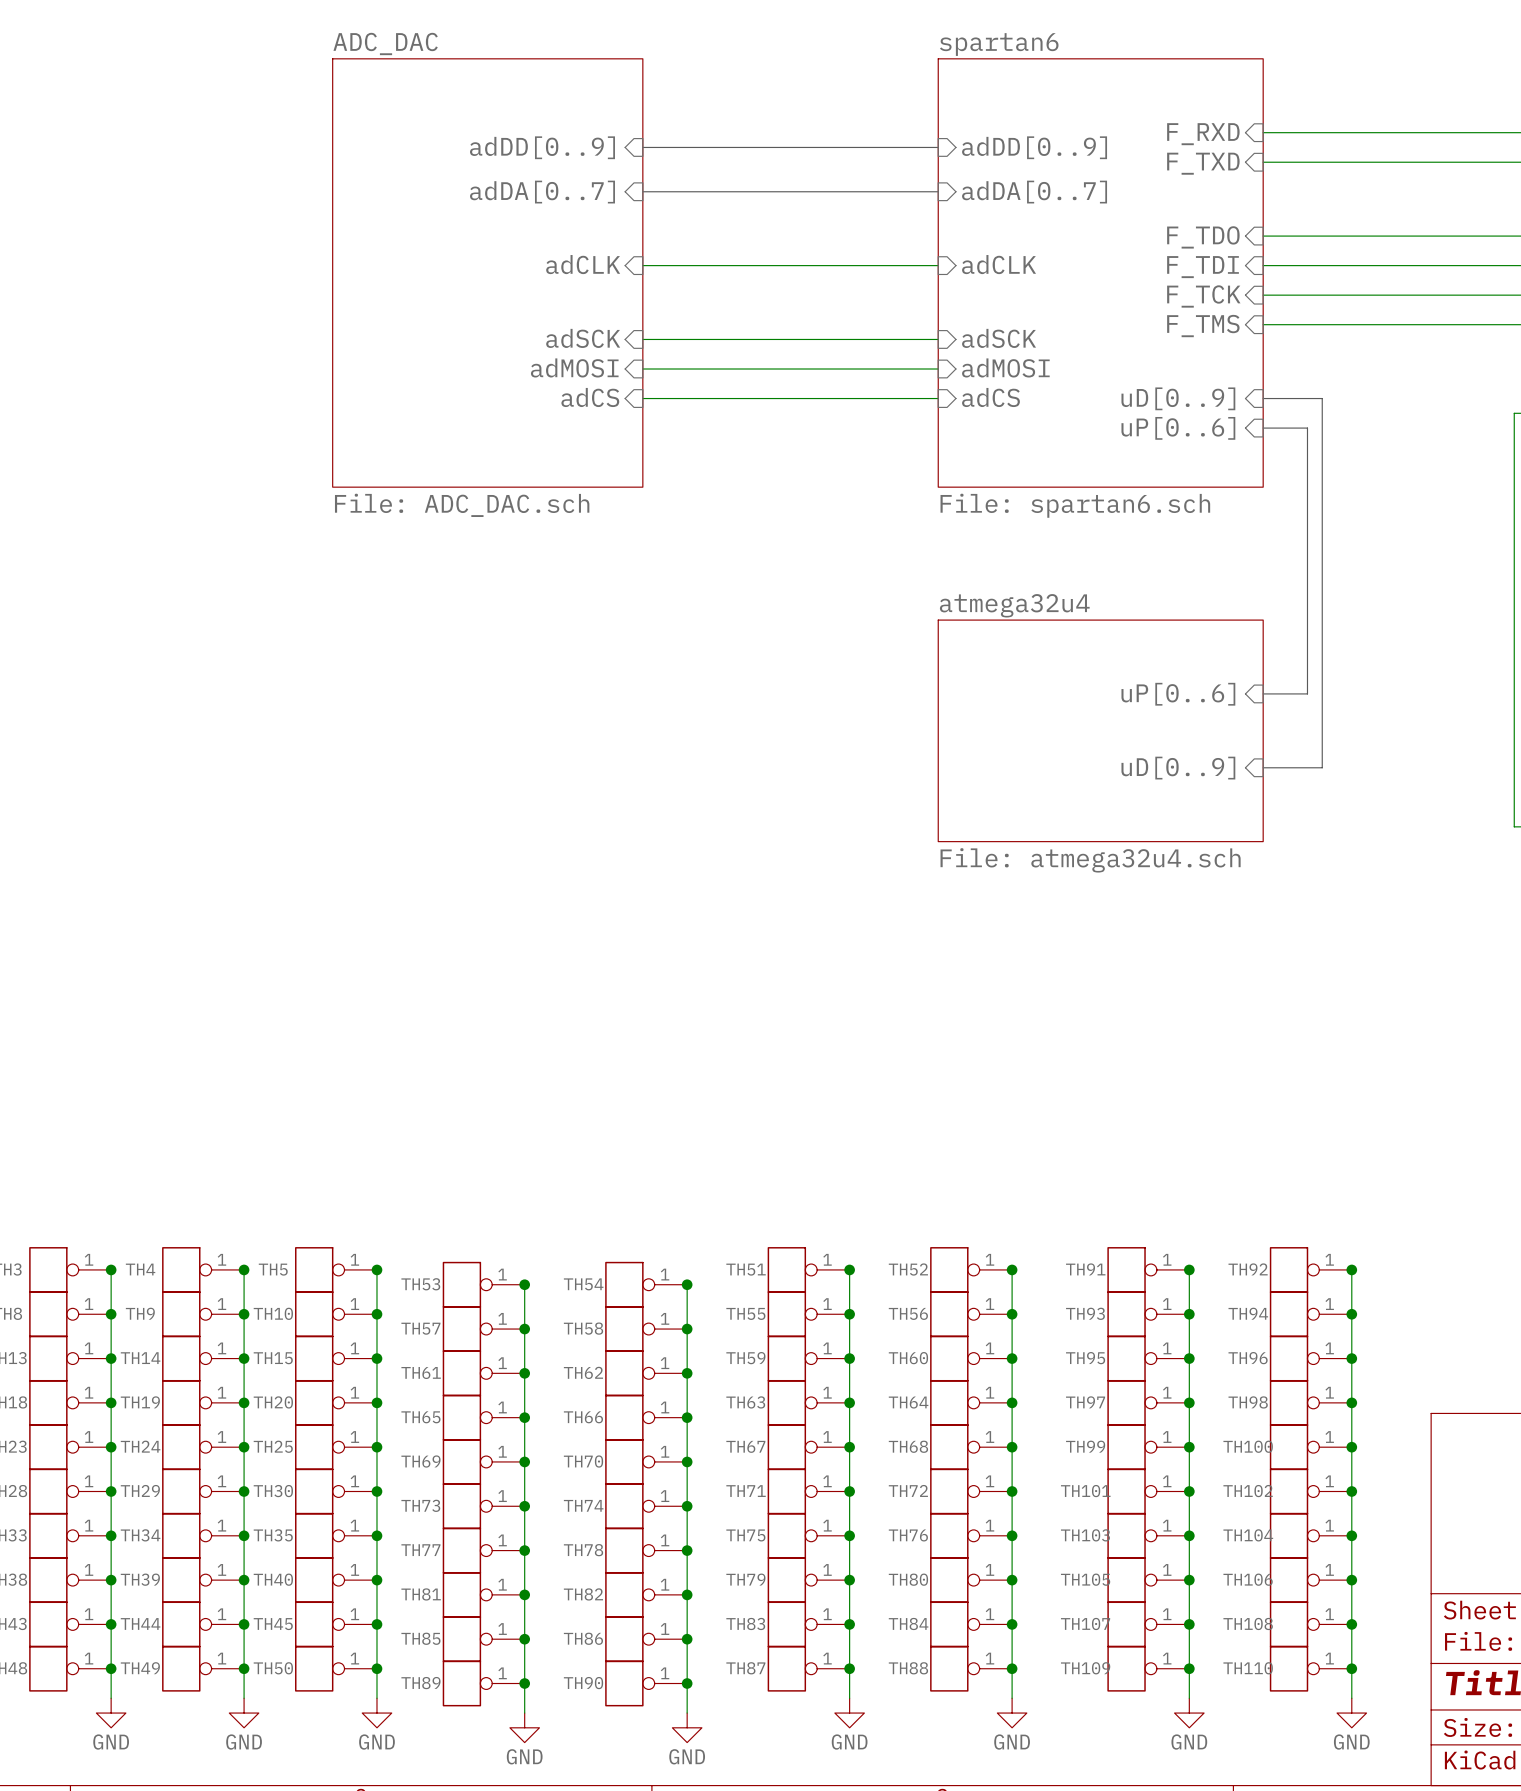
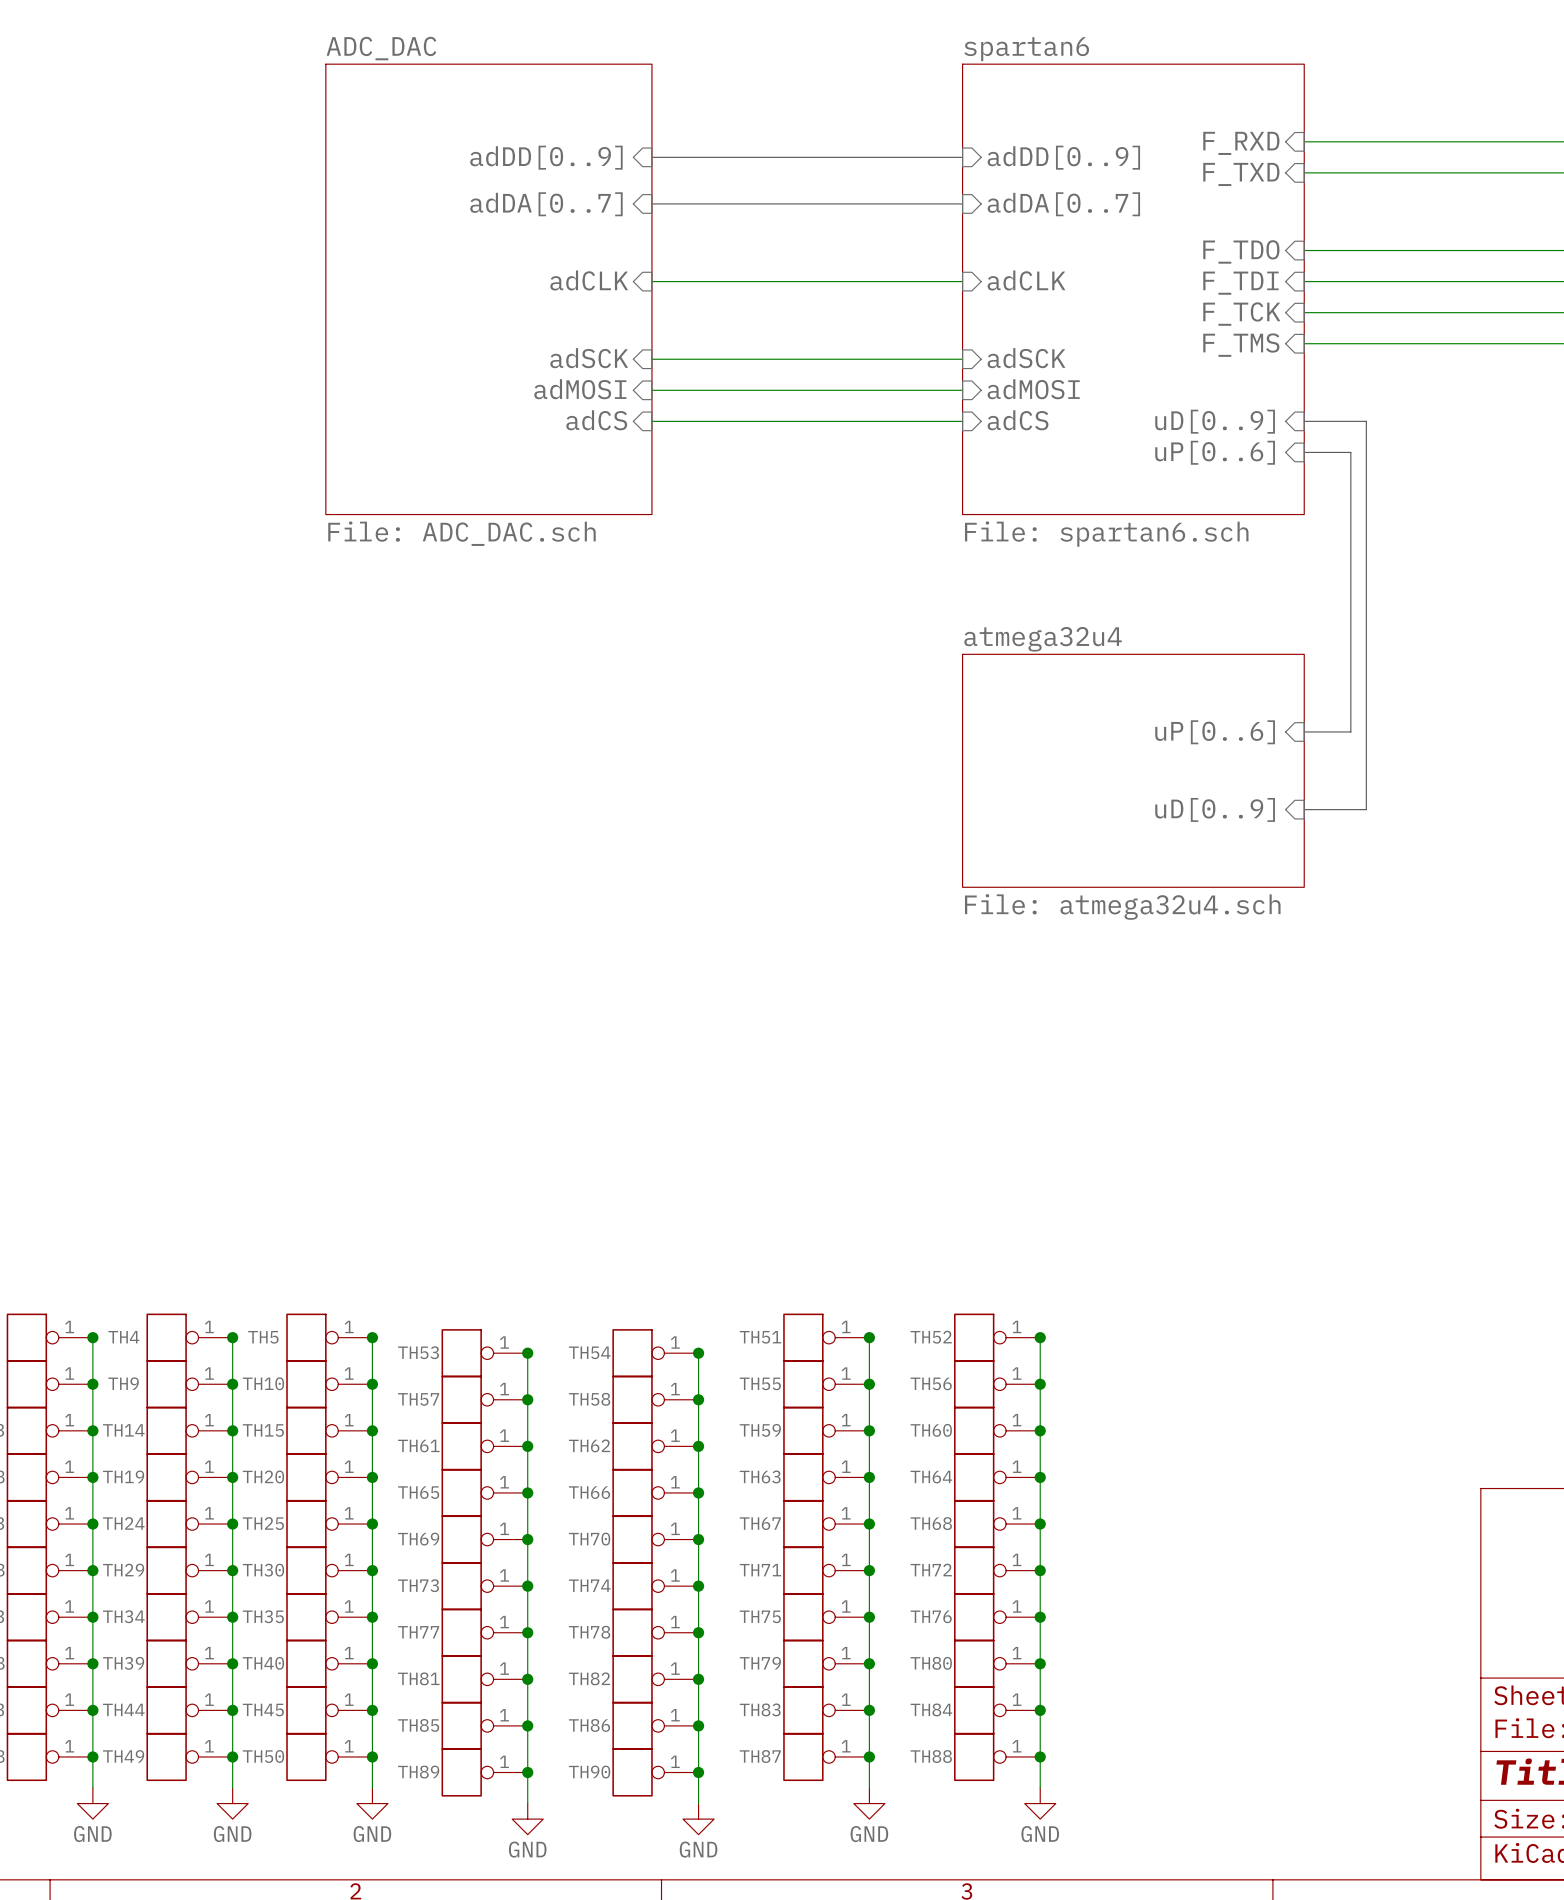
TH91: (1148, 1269) -> none
wire: (1189, 1269) (1189, 1698) -> none
junction: (1189, 1269) -> none
TH92: (1310, 1269) -> none
wire: (1351, 1269) (1351, 1698) -> none
junction: (1351, 1269) -> none
TH93: (1148, 1314) -> none
junction: (1189, 1314) -> none
TH94: (1310, 1314) -> none
junction: (1351, 1314) -> none
TH95: (1148, 1358) -> none
junction: (1189, 1358) -> none
TH96: (1310, 1358) -> none
junction: (1351, 1358) -> none
TH97: (1148, 1402) -> none
junction: (1189, 1402) -> none
TH98: (1310, 1402) -> none
junction: (1351, 1402) -> none
TH99: (1148, 1447) -> none
junction: (1189, 1447) -> none
TH100: (1310, 1447) -> none
junction: (1351, 1447) -> none
TH101: (1148, 1491) -> none
junction: (1189, 1491) -> none
TH102: (1310, 1491) -> none
junction: (1351, 1491) -> none
TH103: (1148, 1535) -> none
junction: (1189, 1535) -> none
TH104: (1310, 1535) -> none
junction: (1351, 1535) -> none
TH105: (1148, 1580) -> none
junction: (1189, 1580) -> none
TH106: (1310, 1580) -> none
junction: (1351, 1580) -> none
TH107: (1148, 1624) -> none
junction: (1189, 1624) -> none
TH108: (1310, 1624) -> none
junction: (1351, 1624) -> none
TH109: (1148, 1668) -> none
junction: (1189, 1668) -> none
TH110: (1310, 1668) -> none
junction: (1351, 1668) -> none
power symbol: GND (1189, 1713) -> none
power symbol: GND (1351, 1713) -> none

